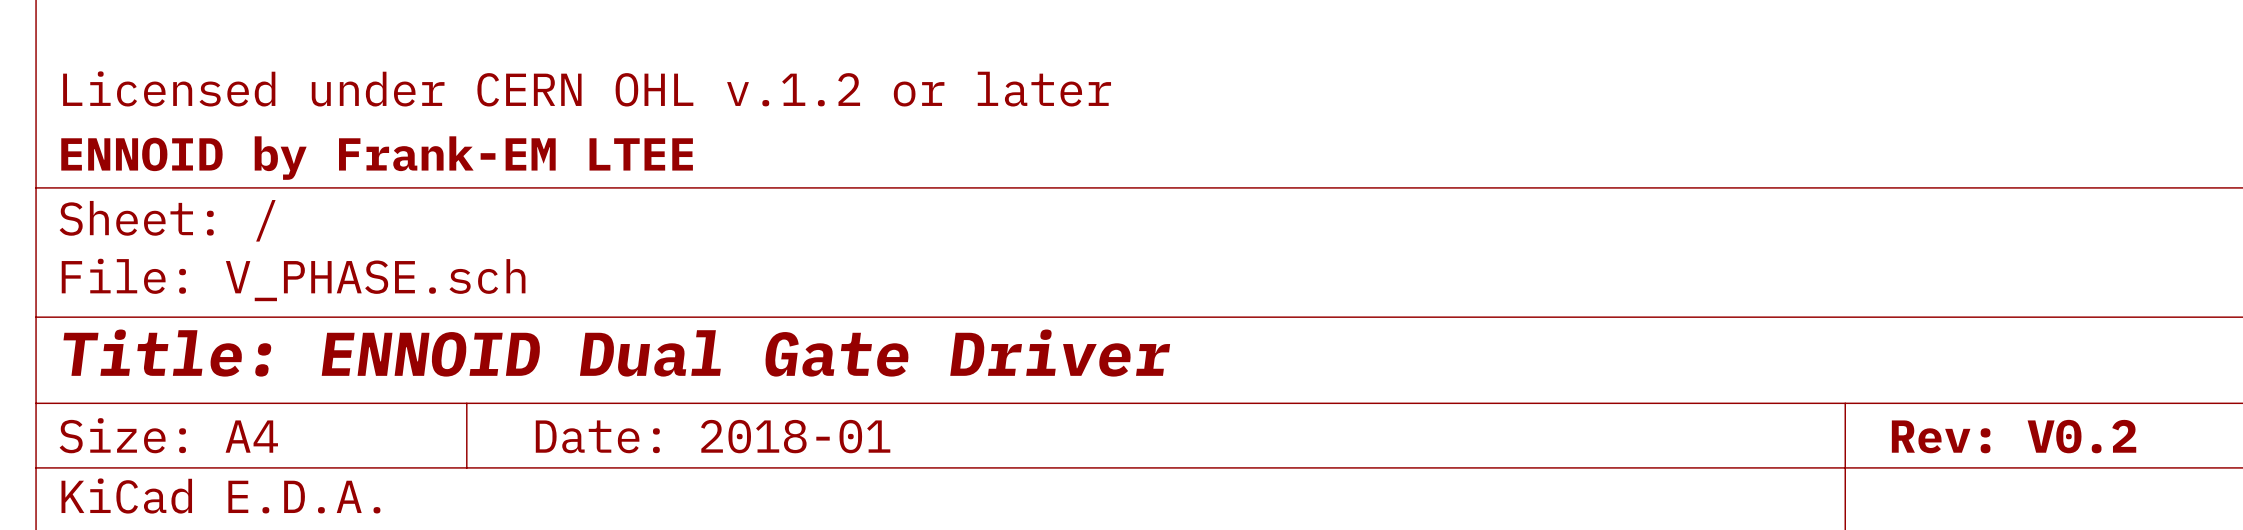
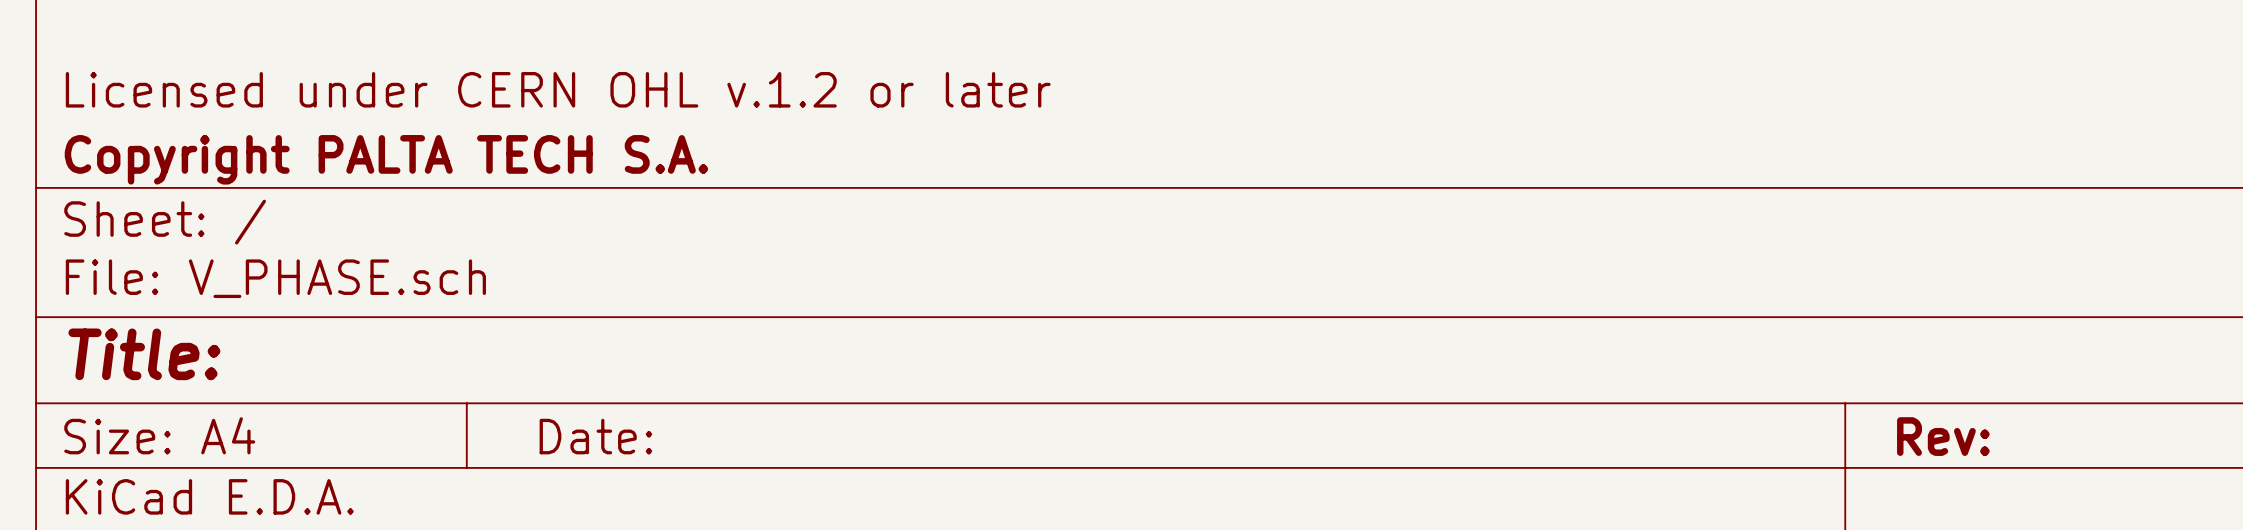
title block: ENNOID by Frank-EM LTEE (377, 158) -> Copyright PALTA TECH S.A. (386, 159)
title block: Title: ENNOID Dual Gate Driver (616, 353) -> Title: (144, 354)
title block: Date: 2018-01 (713, 436) -> Date: (595, 436)
title block: Rev: V0.2 (2014, 436) -> Rev: (1943, 436)

